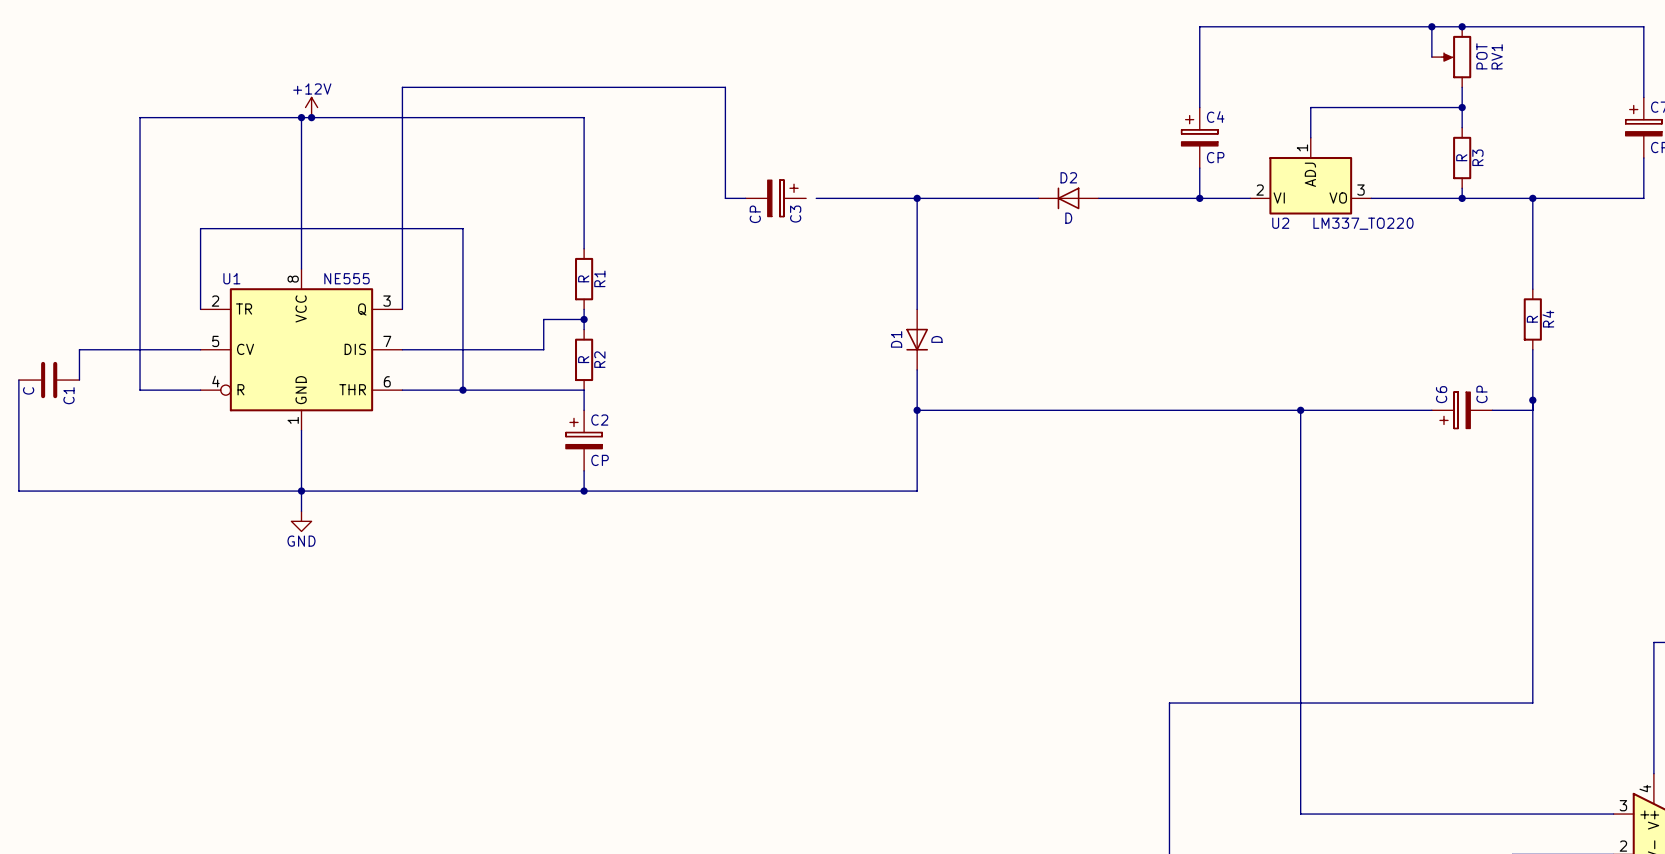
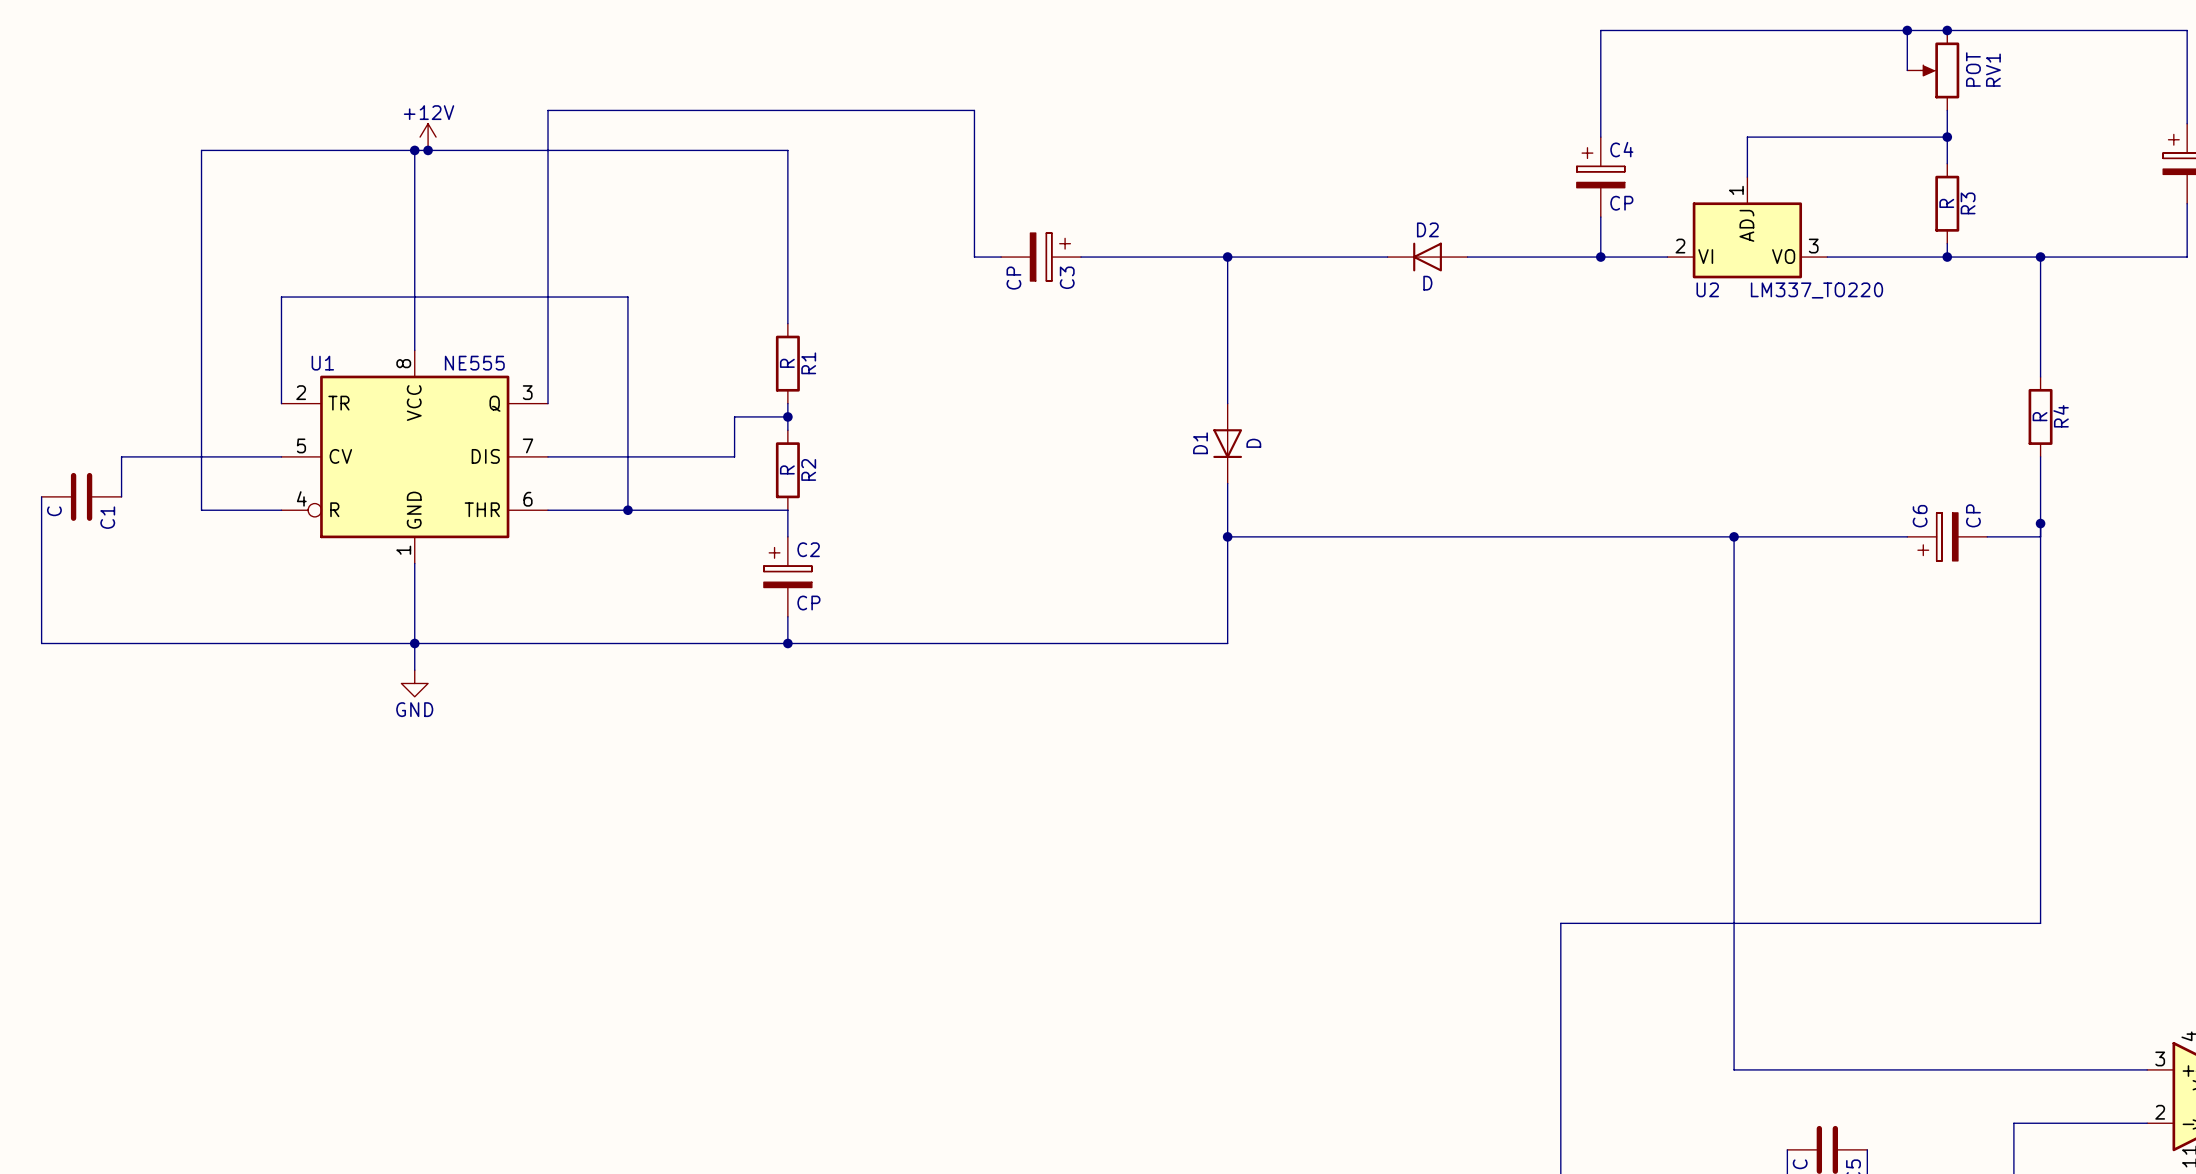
wire: none -> (1081, 257) (1094, 257)

